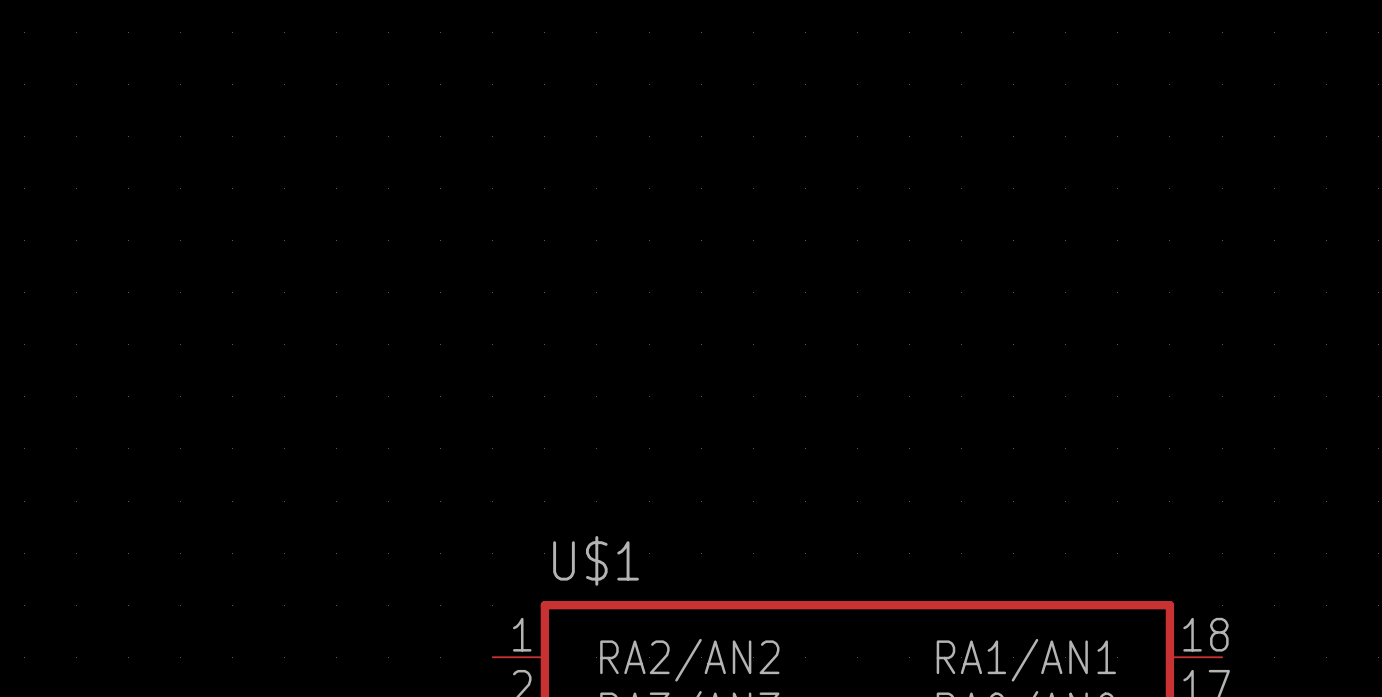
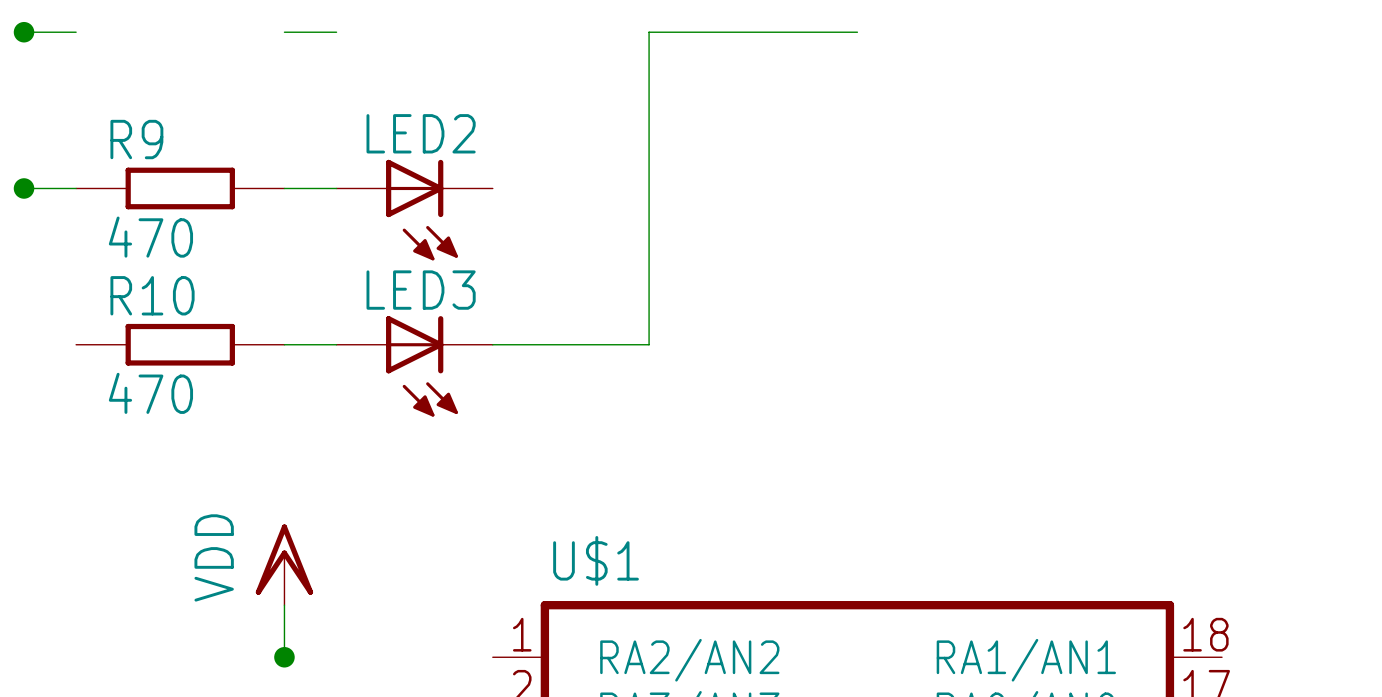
wire: none -> (24, 32) (76, 32)
junction: none -> (24, 32)
wire: none -> (284, 32) (336, 32)
wire: none -> (857, 32) (649, 32) (649, 344) (492, 344)
wire: none -> (24, 188) (76, 188)
junction: none -> (24, 188)
R9: none -> 470 (180, 188)
wire: none -> (284, 188) (336, 188)
LED2: none -> (414, 210)
R10: none -> 470 (180, 344)
wire: none -> (284, 344) (336, 344)
LED3: none -> (414, 366)
power symbol: none -> VDD (284, 564)
wire: none -> (284, 605) (284, 657)
junction: none -> (284, 657)

